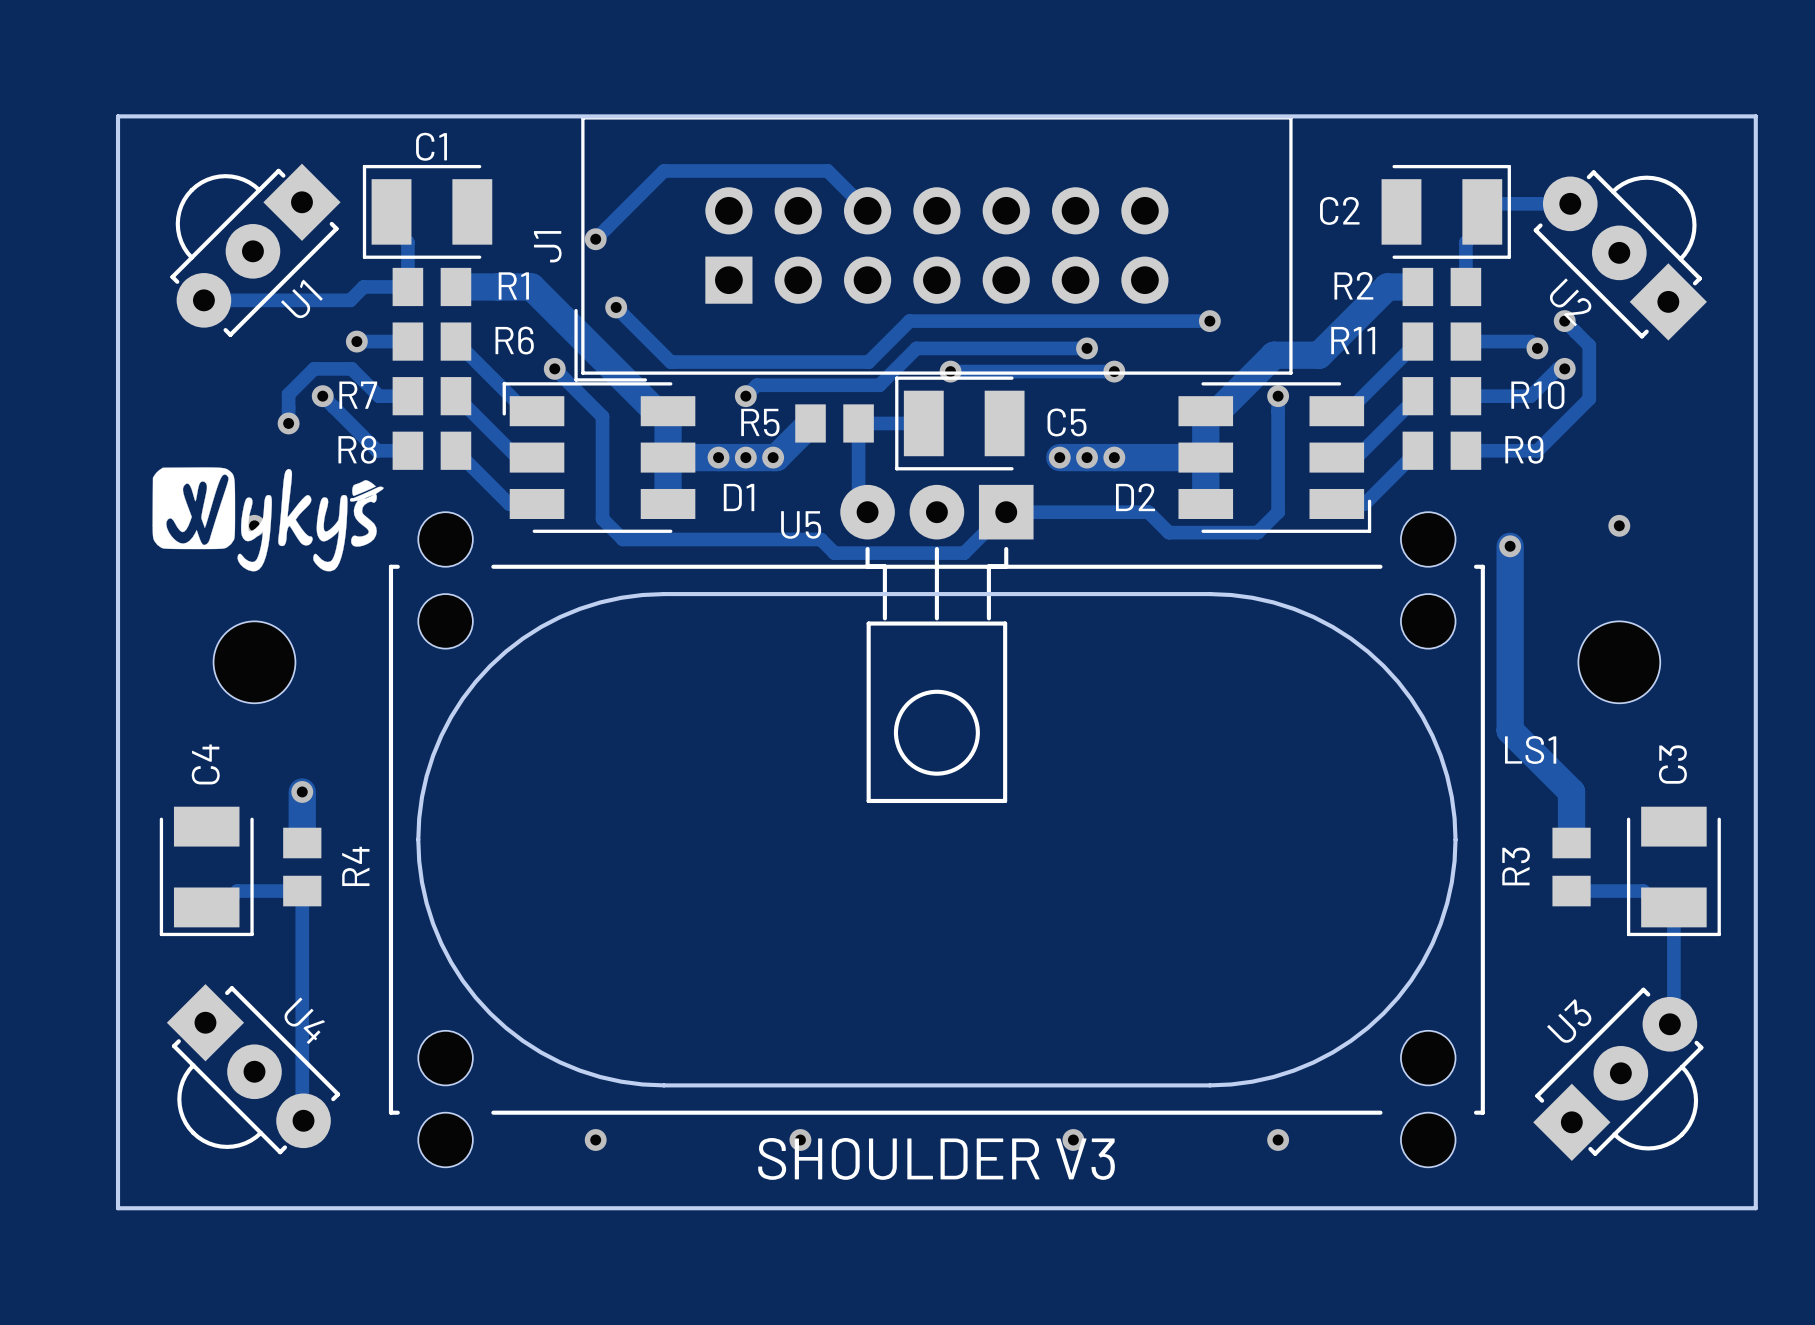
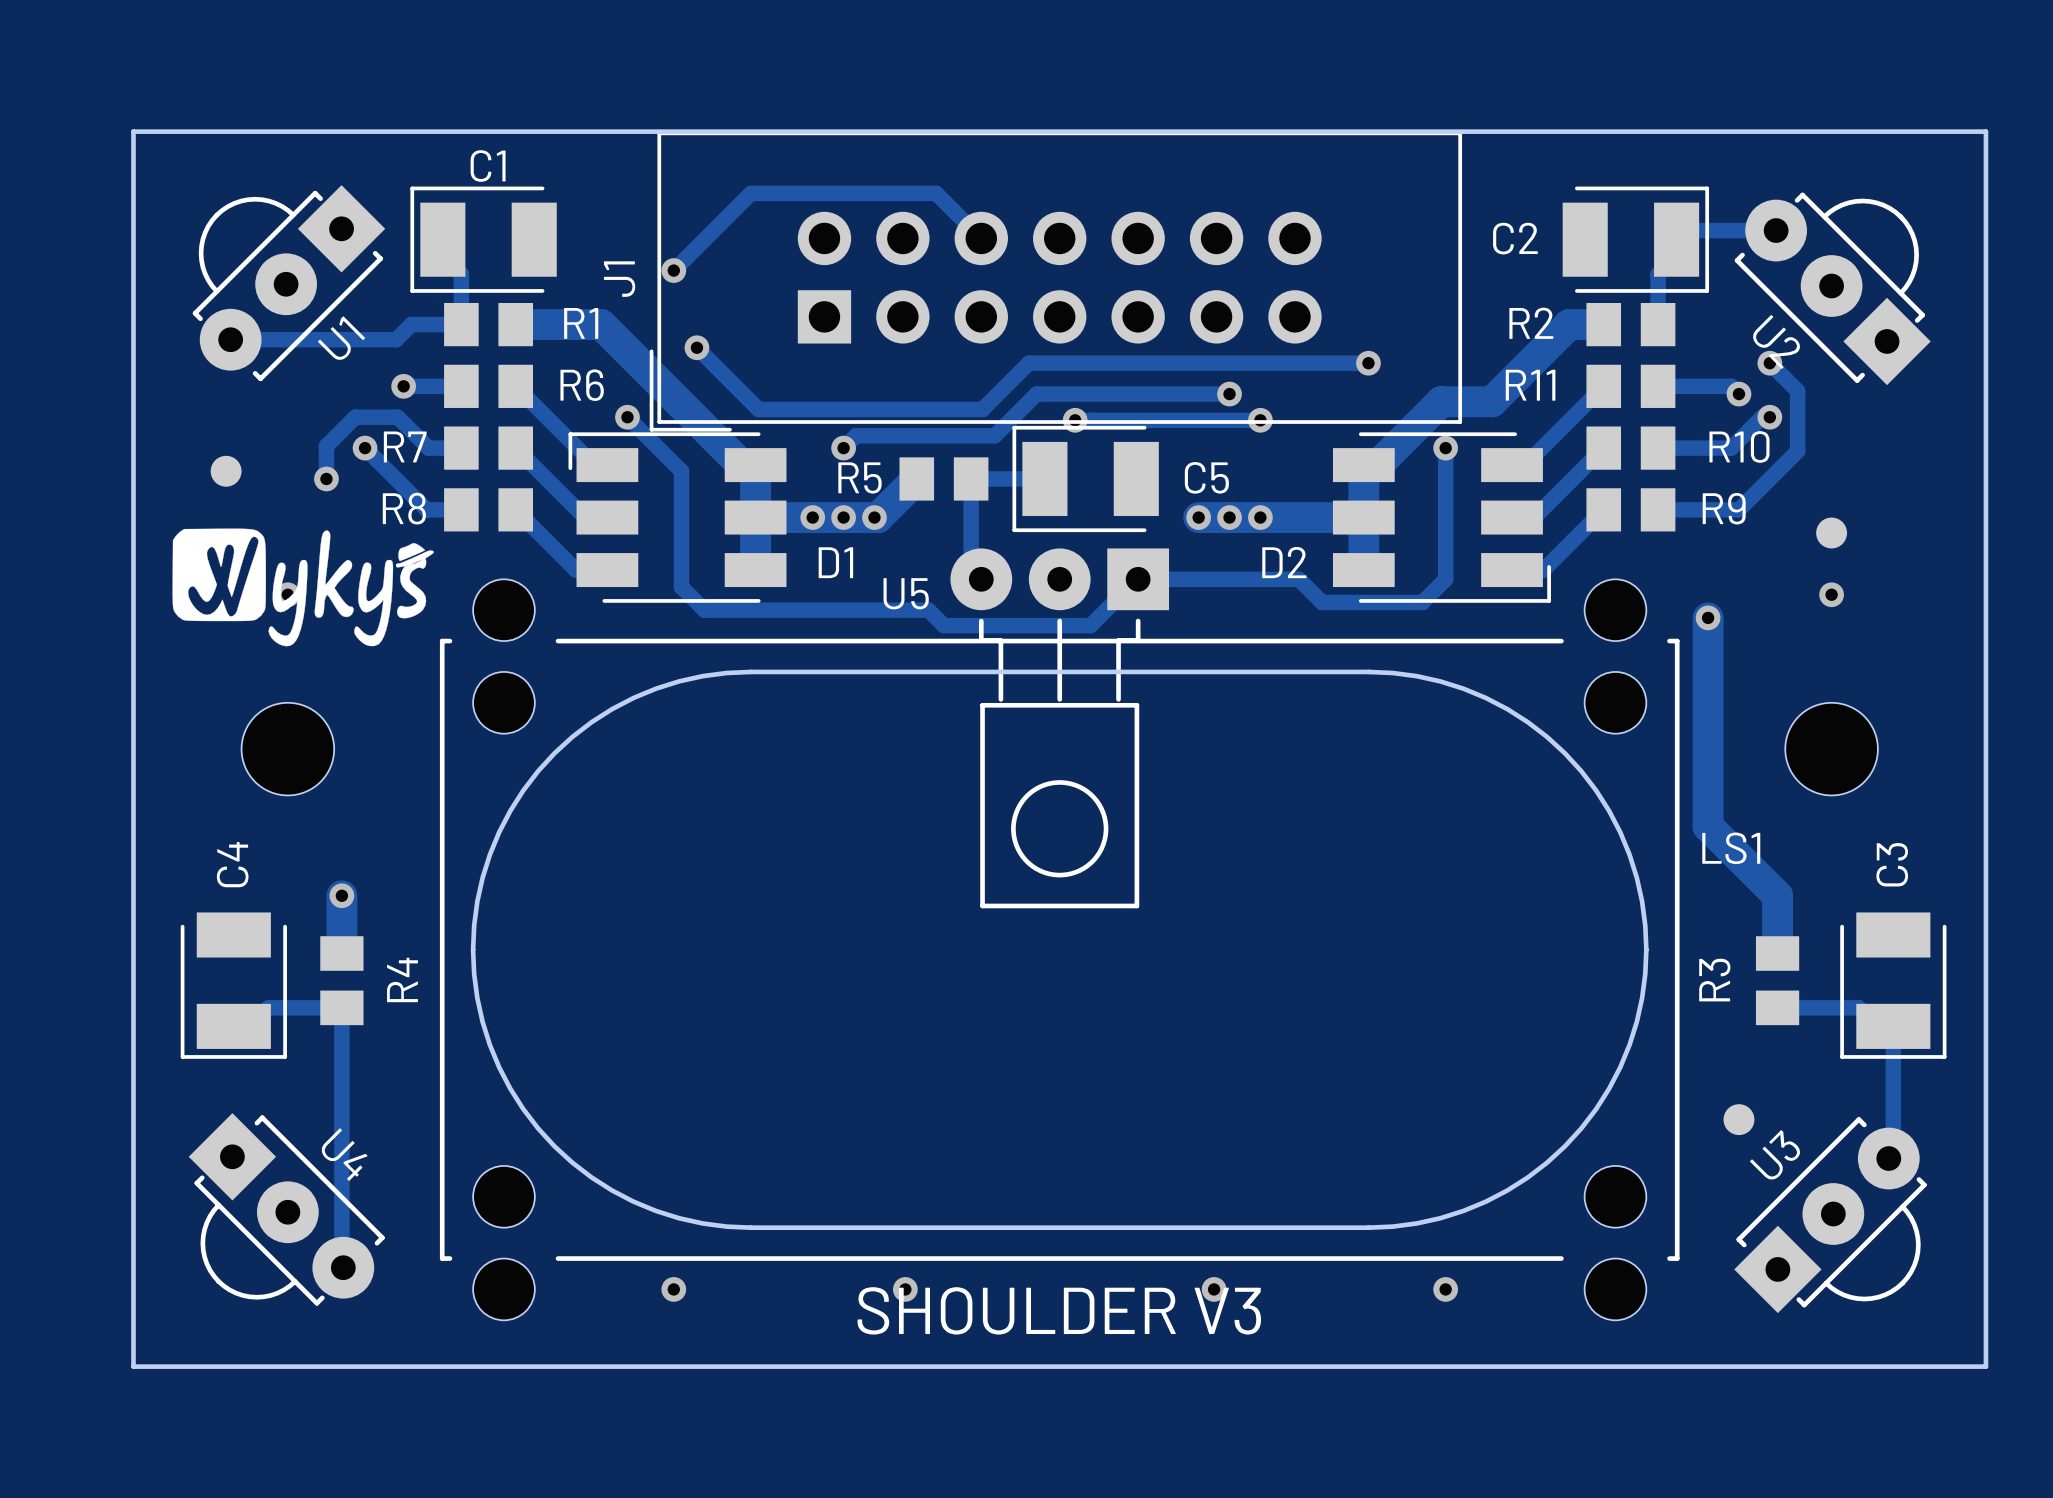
part: none -> (226, 471)
part: none -> (1831, 533)
part: none -> (1738, 1119)

